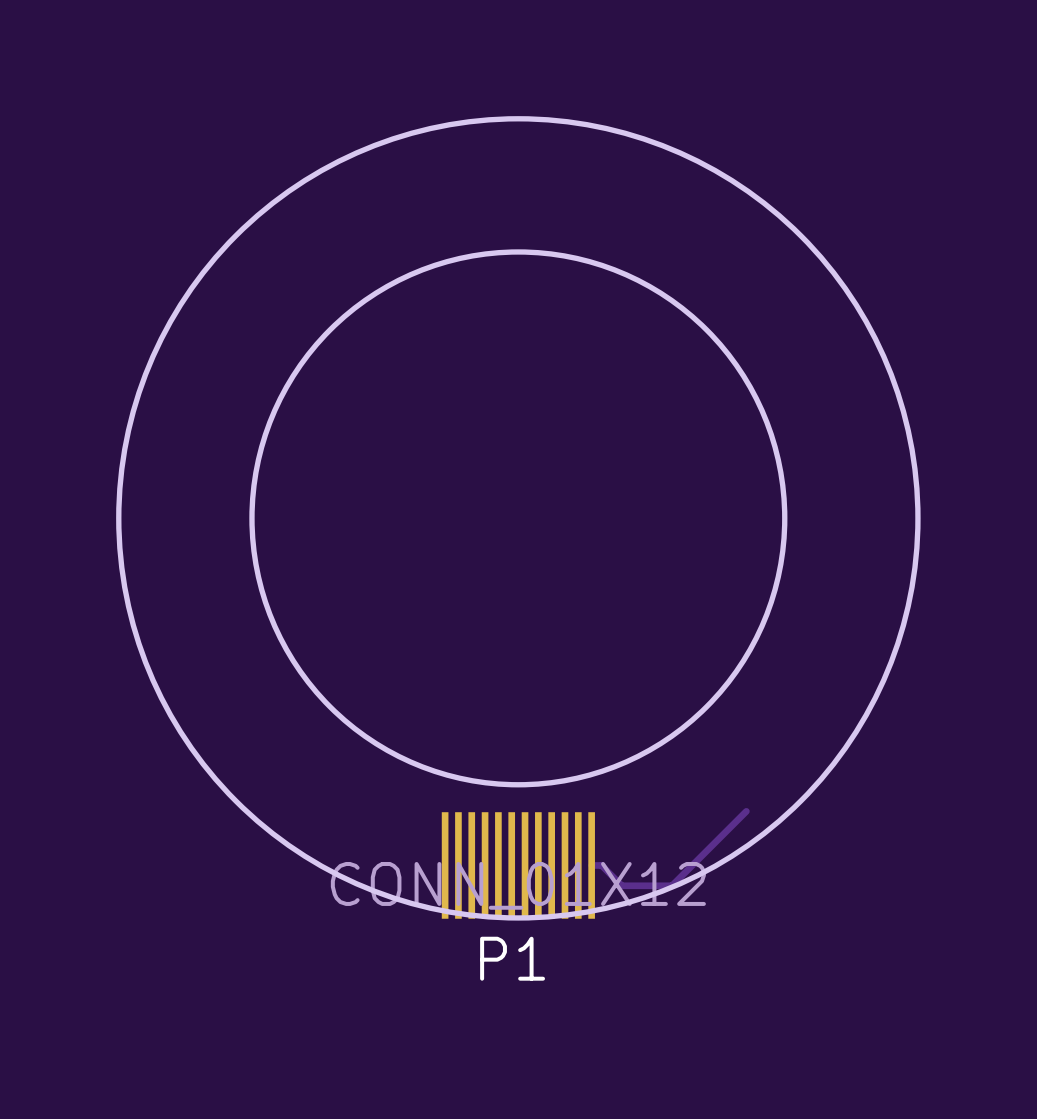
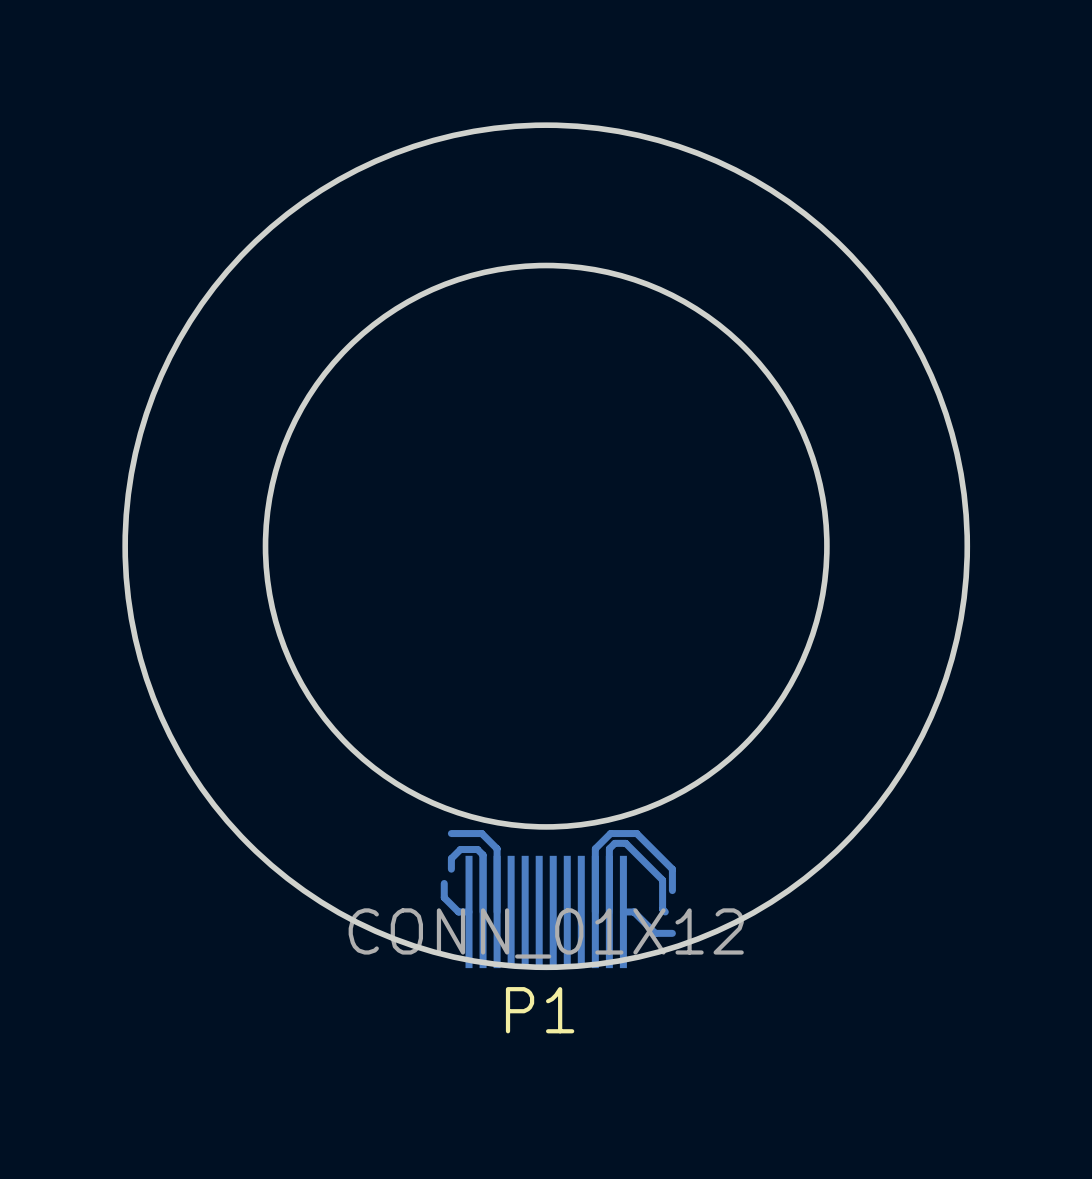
track: none -> (451, 833) (481, 833) (497, 848) (497, 911)
track: (746, 811) (671, 885) (638, 885) -> none
track: none -> (451, 869) (451, 858) (460, 849) (477, 849) (483, 854) (483, 911)
track: none -> (444, 883) (444, 897) (458, 911) (469, 911)
track: none -> (672, 890) (672, 869) (636, 833) (610, 833) (595, 848) (595, 911)
track: none -> (665, 911) (662, 909) (662, 880) (625, 843) (614, 843) (609, 848) (609, 911)

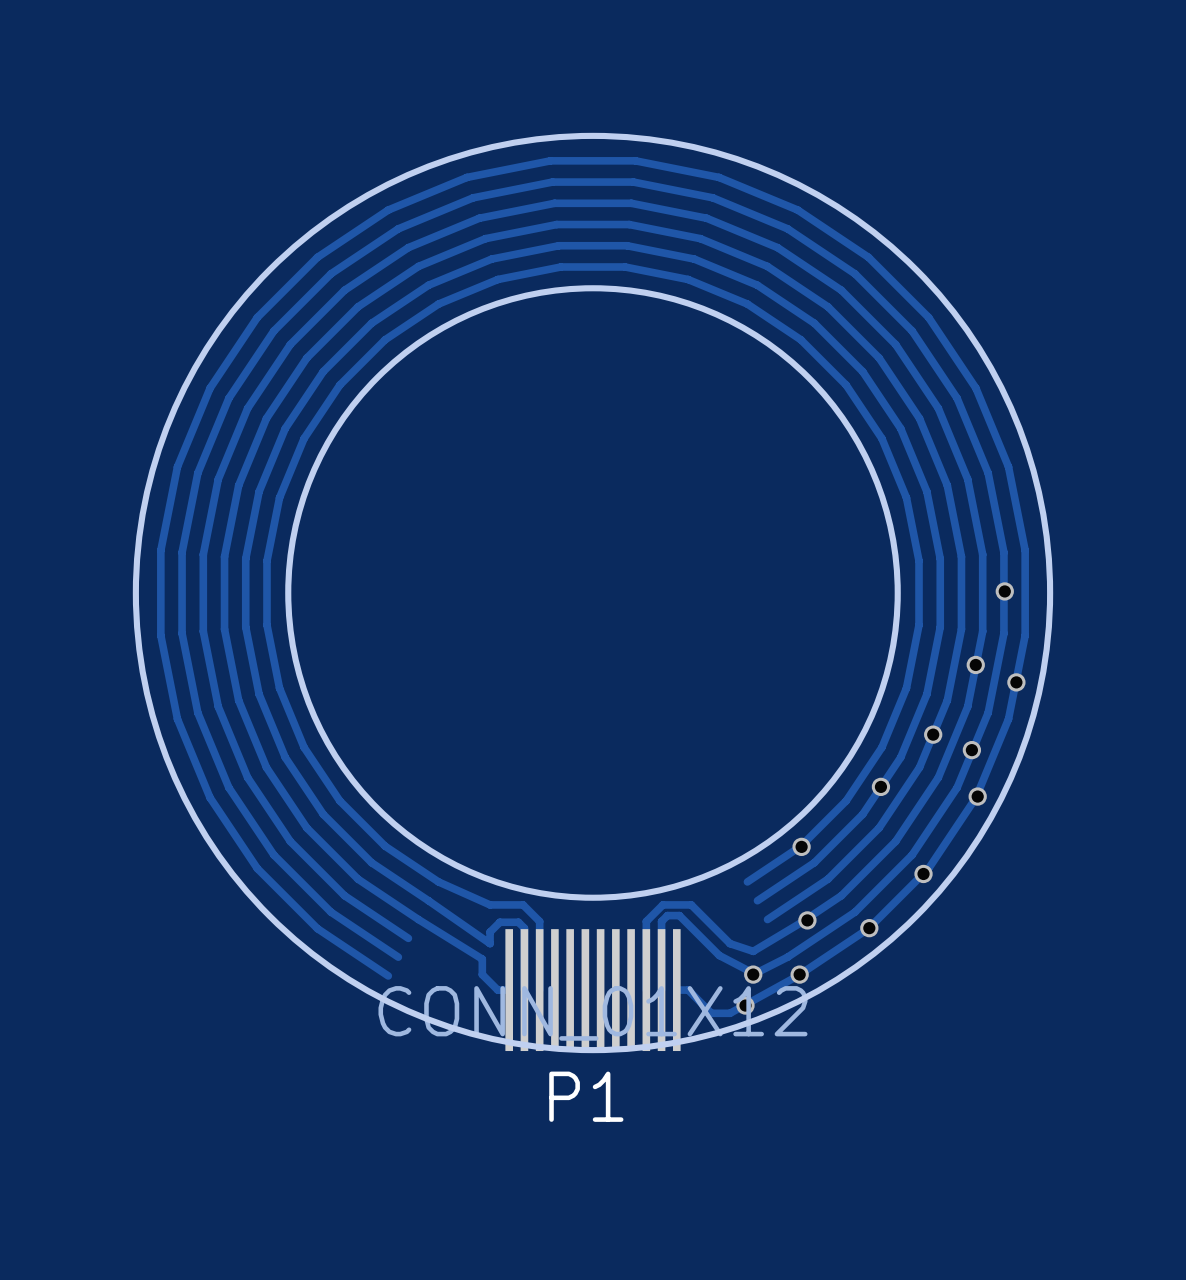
via: none -> (1004, 591)
via: none -> (975, 664)
via: none -> (1016, 682)
via: none -> (933, 734)
via: none -> (971, 750)
via: none -> (880, 786)
via: none -> (977, 796)
track: none -> (975, 797) (928, 868) (868, 928) (797, 975) (730, 1013)
track: none -> (975, 797) (1008, 719) (1025, 635) (1025, 550) (1008, 466) (975, 388) (928, 317) (868, 257) (797, 210) (719, 177) (635, 160) (550, 160) (466, 177) (388, 210) (317, 257) (257, 317) (210, 388) (177, 466) (160, 550) (160, 635) (177, 719) (210, 797) (257, 868) (317, 928) (388, 975)
track: none -> (800, 846) (846, 800) (881, 747) (906, 688) (919, 625) (919, 560) (906, 497) (881, 438) (846, 385) (800, 339) (747, 304) (688, 279) (625, 266) (560, 266) (497, 279) (438, 304) (385, 339) (339, 385) (304, 438) (279, 497) (266, 560) (266, 625) (279, 688) (304, 747) (339, 800) (385, 846) (438, 881) (490, 904)
track: none -> (800, 846) (747, 881)
via: none -> (801, 846)
via: none -> (923, 873)
track: none -> (757, 900) (814, 862) (862, 814) (900, 757) (926, 694) (940, 627) (940, 558) (926, 491) (900, 428) (862, 371) (814, 323) (757, 285) (694, 259) (627, 245) (558, 245) (491, 259) (428, 285) (371, 323) (323, 371) (285, 428) (259, 491) (245, 558) (245, 627) (259, 694) (285, 757) (323, 814) (371, 862) (490, 943)
track: none -> (767, 919) (827, 879) (879, 827) (919, 767) (947, 700) (961, 629) (961, 556) (947, 485) (919, 418) (879, 358) (827, 306) (767, 266) (700, 238) (629, 224) (556, 224) (485, 238) (418, 266) (358, 306) (306, 358) (266, 418) (238, 485) (224, 556) (224, 629) (238, 700) (266, 767) (306, 827) (358, 879) (482, 959)
via: none -> (807, 920)
via: none -> (869, 928)
track: (672, 869) (672, 890) -> (730, 943) (753, 951) (841, 895) (895, 841) (938, 777) (967, 706) (982, 631) (982, 554) (967, 479) (938, 408) (895, 344) (841, 290) (777, 247) (706, 218) (631, 203) (554, 203) (479, 218) (408, 247) (344, 290) (290, 344) (247, 408) (218, 479) (203, 554) (203, 631) (218, 706) (247, 777) (290, 841) (344, 895) (408, 938)
track: (662, 880) (662, 909) (665, 911) -> (719, 955) (753, 974) (787, 957) (854, 912) (912, 854) (957, 787) (988, 712) (1003, 633) (1003, 552) (988, 473) (957, 398) (912, 331) (854, 273) (787, 228) (712, 197) (633, 182) (552, 182) (473, 197) (398, 228) (331, 273) (273, 331) (228, 398) (197, 473) (182, 552) (182, 633) (197, 712) (228, 787) (273, 854) (331, 912) (398, 957)
via: none -> (753, 974)
via: none -> (799, 974)
via: none -> (745, 1005)

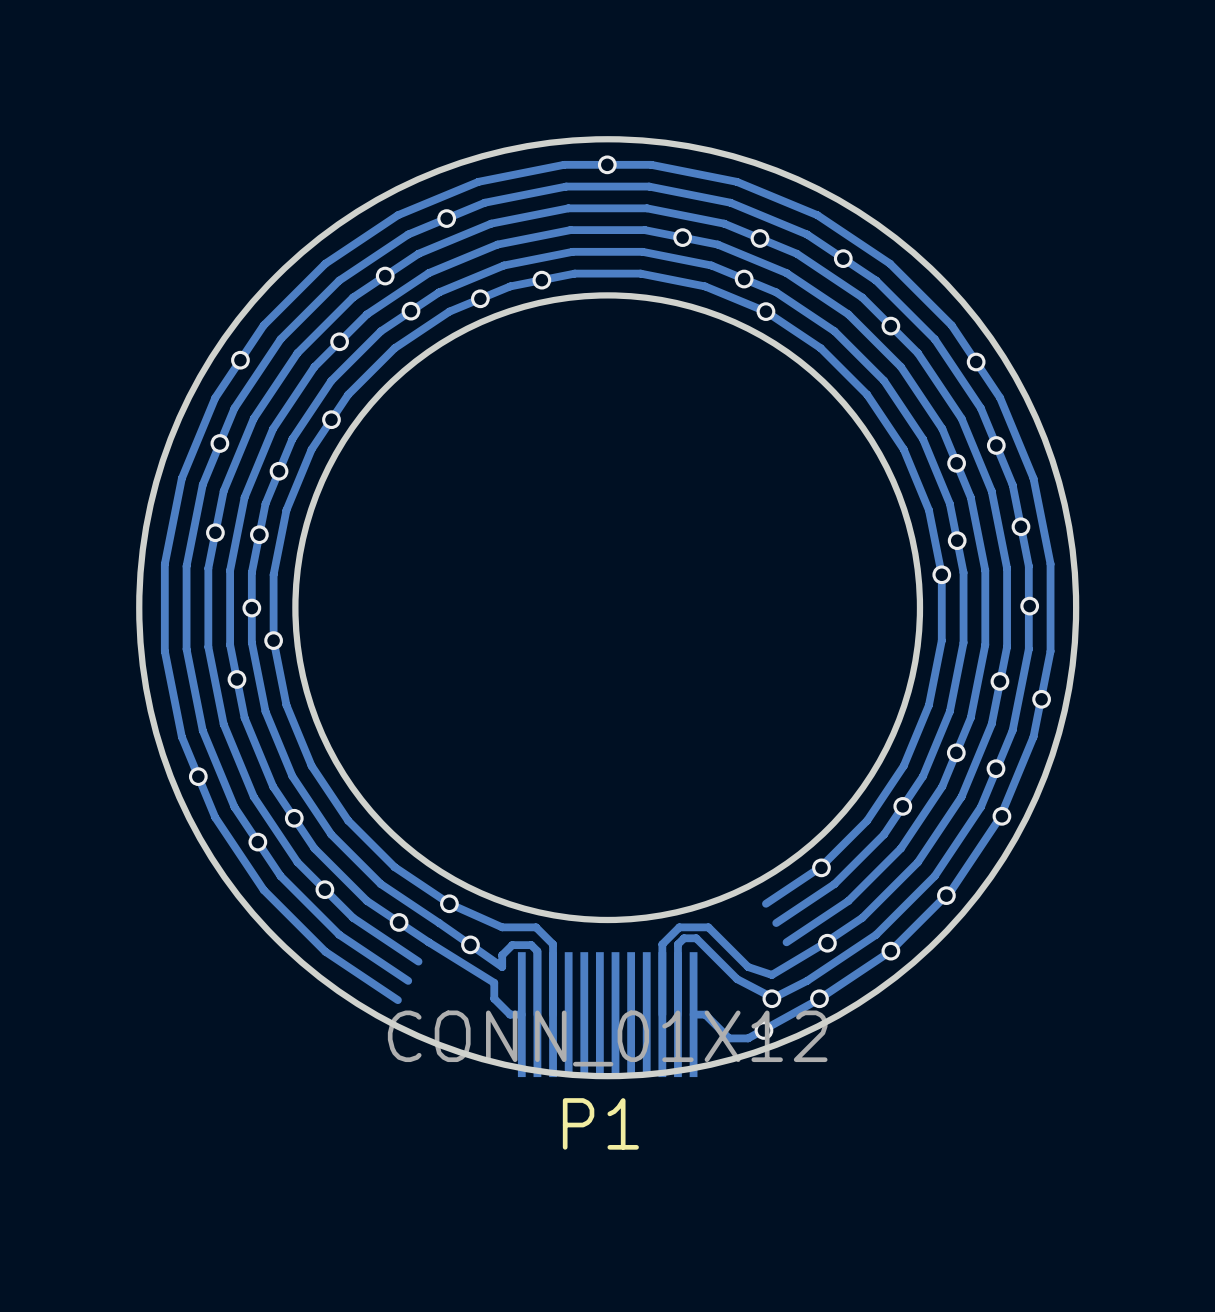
via: none -> (607, 164)
via: none -> (446, 218)
via: none -> (682, 237)
via: none -> (760, 238)
via: none -> (843, 258)
via: none -> (385, 276)
via: none -> (744, 279)
via: none -> (541, 280)
via: none -> (480, 298)
via: none -> (410, 311)
via: none -> (765, 311)
via: none -> (890, 326)
via: none -> (339, 341)
via: none -> (240, 360)
via: none -> (976, 362)
via: none -> (331, 419)
via: none -> (219, 443)
via: none -> (996, 445)
via: none -> (956, 463)
via: none -> (279, 471)
via: none -> (1020, 526)
via: none -> (215, 532)
via: none -> (259, 534)
via: none -> (957, 540)
via: none -> (941, 574)
via: none -> (251, 608)
via: none -> (273, 640)
via: none -> (236, 679)
via: none -> (198, 776)
via: none -> (294, 818)
via: none -> (257, 842)
via: none -> (324, 889)
via: none -> (449, 903)
via: none -> (399, 922)
via: none -> (470, 944)

